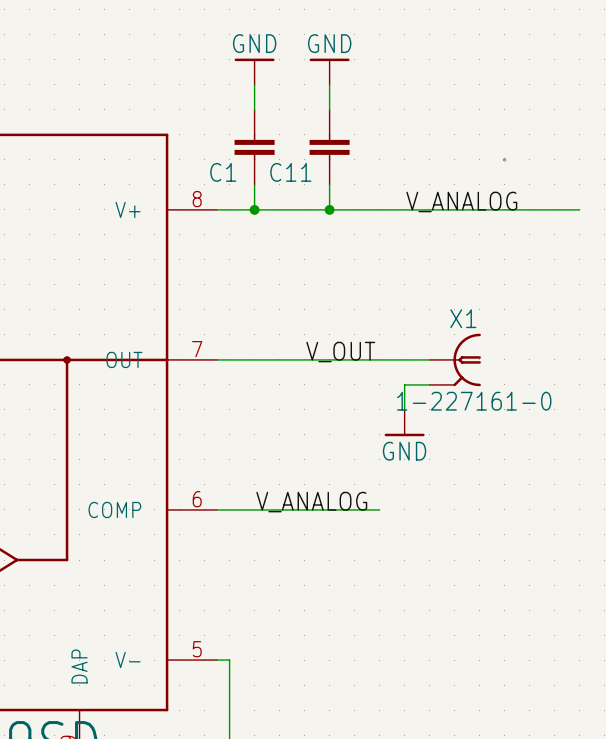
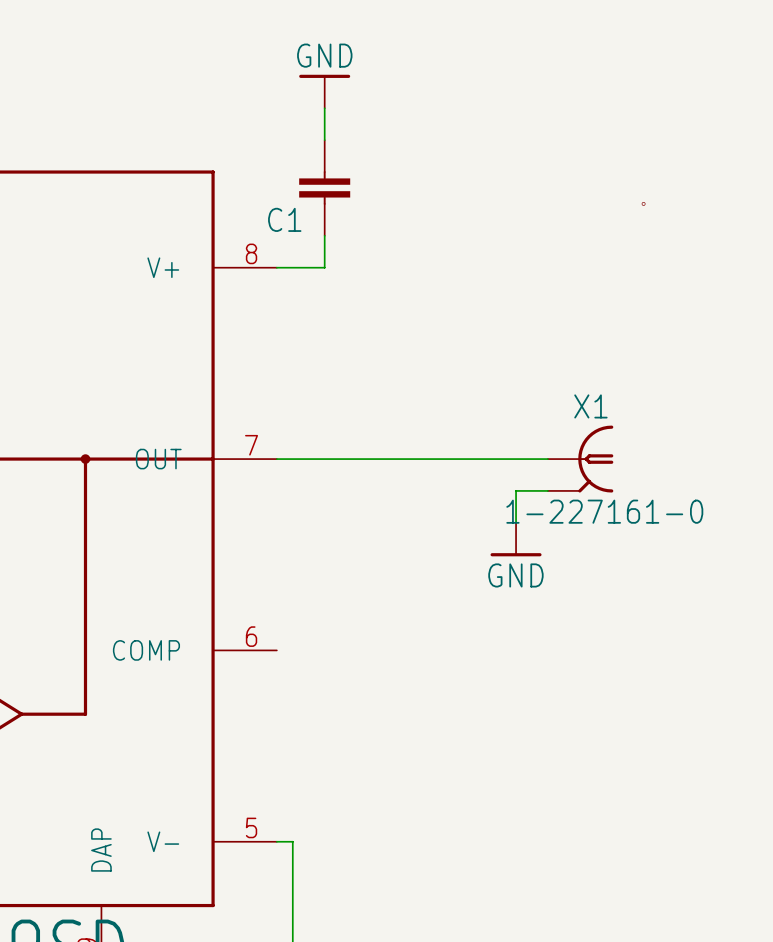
power symbol: GND (329, 71) -> none
wire: (329, 84) (329, 109) -> none
C11: (329, 147) -> none
wire: (329, 184) (329, 209) -> none
label: V_ANALOG (461, 201) -> none
wire: (254, 209) (579, 209) -> none
junction: (254, 209) -> none
junction: (329, 209) -> none
label: V_OUT (340, 352) -> none
label: V_ANALOG (311, 502) -> none
wire: (217, 509) (379, 509) -> none

